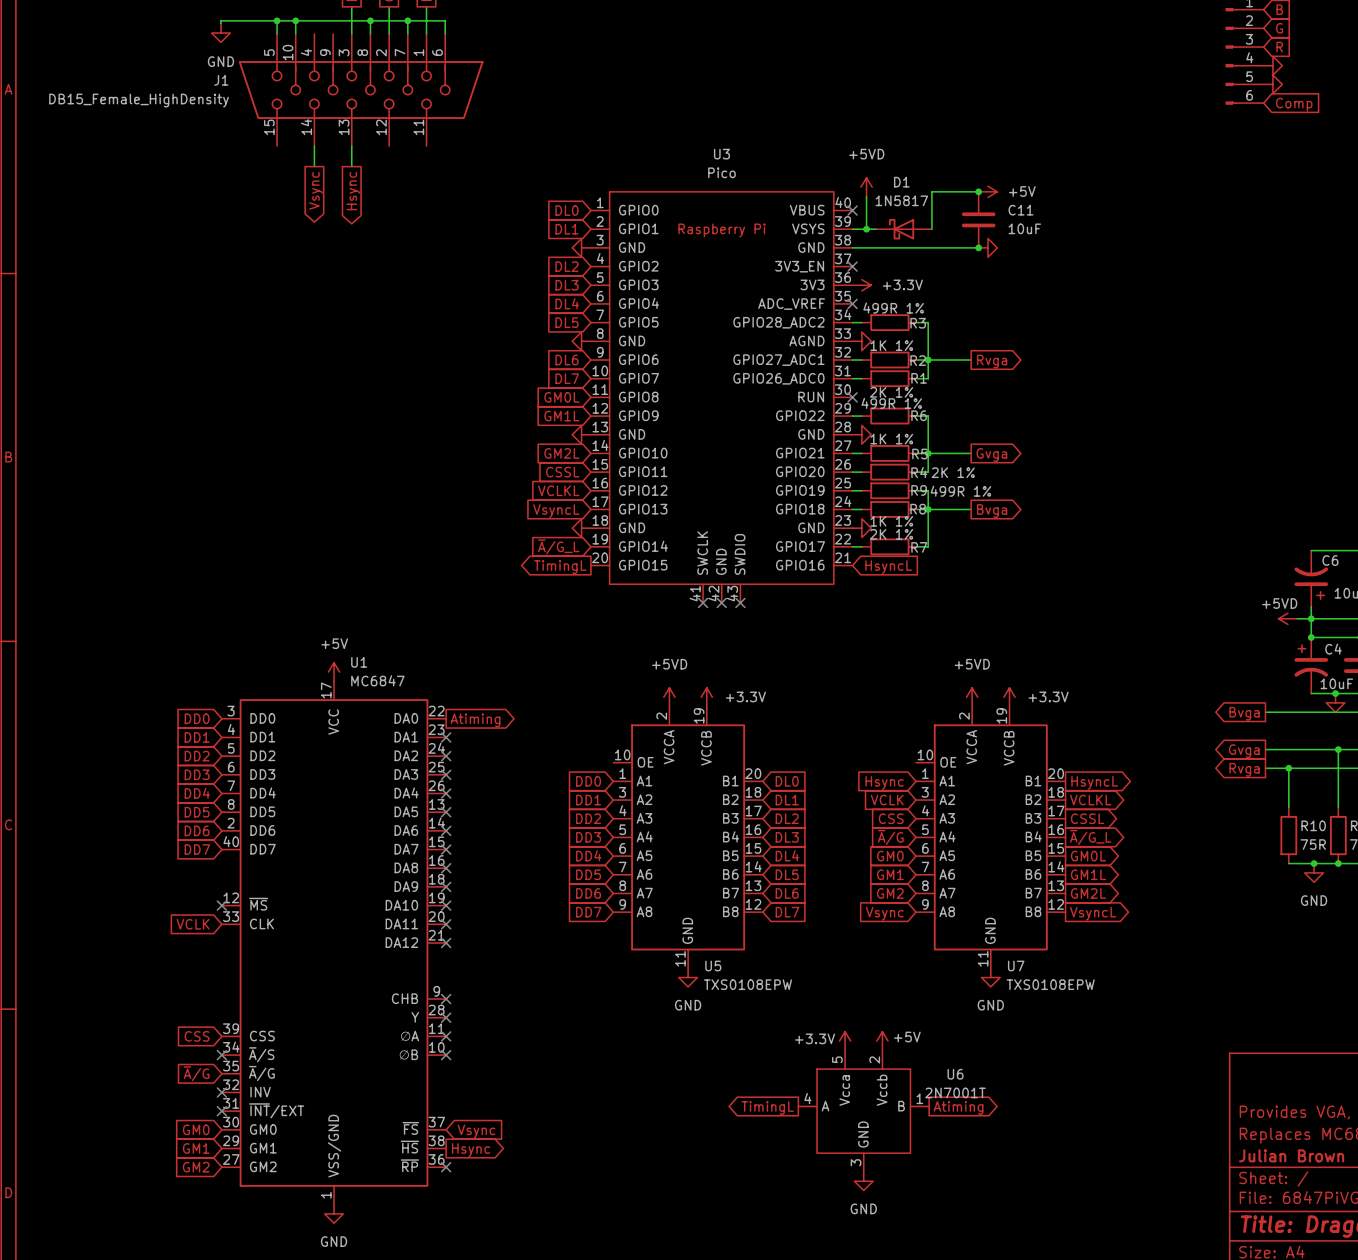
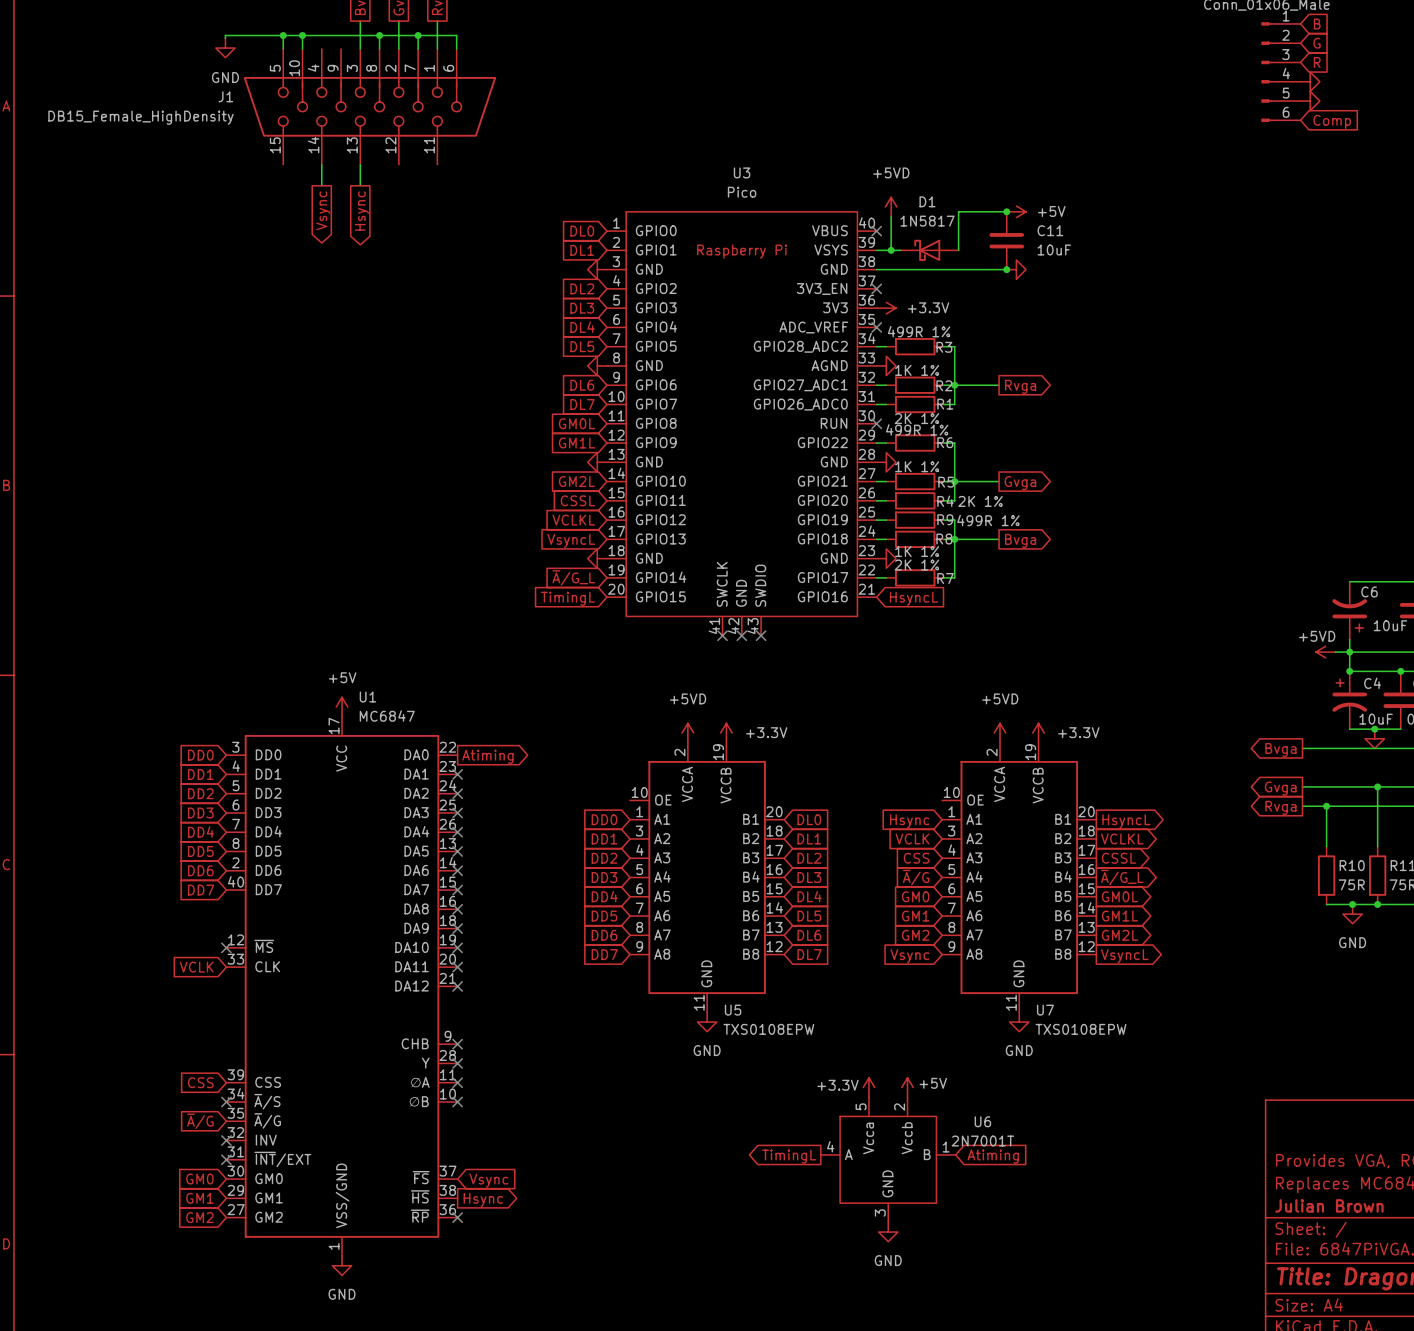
global label shape: output (560, 567) -> input (568, 598)
global label shape: output (958, 1108) -> input (993, 1156)

